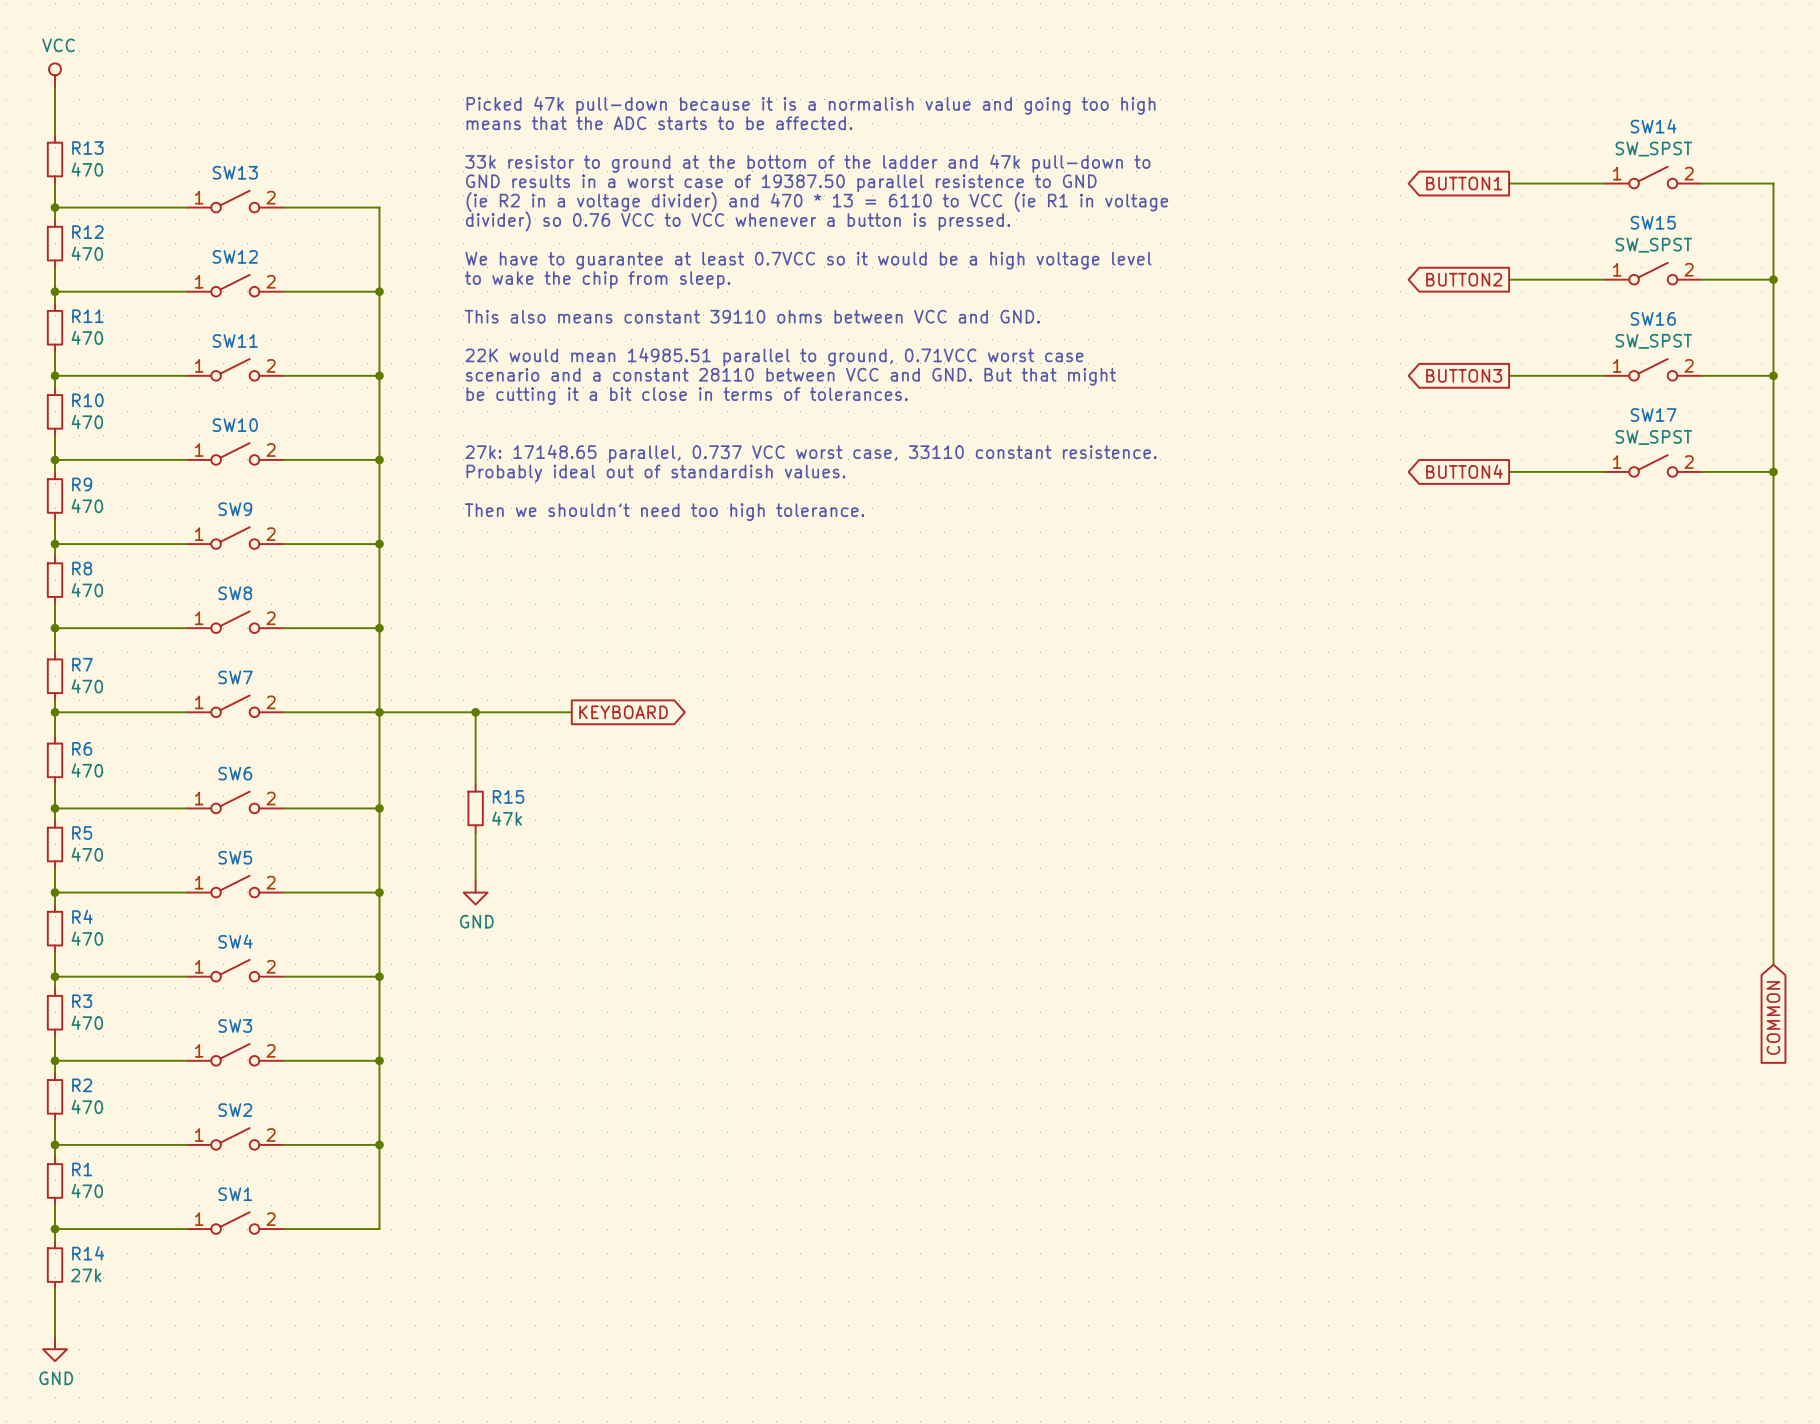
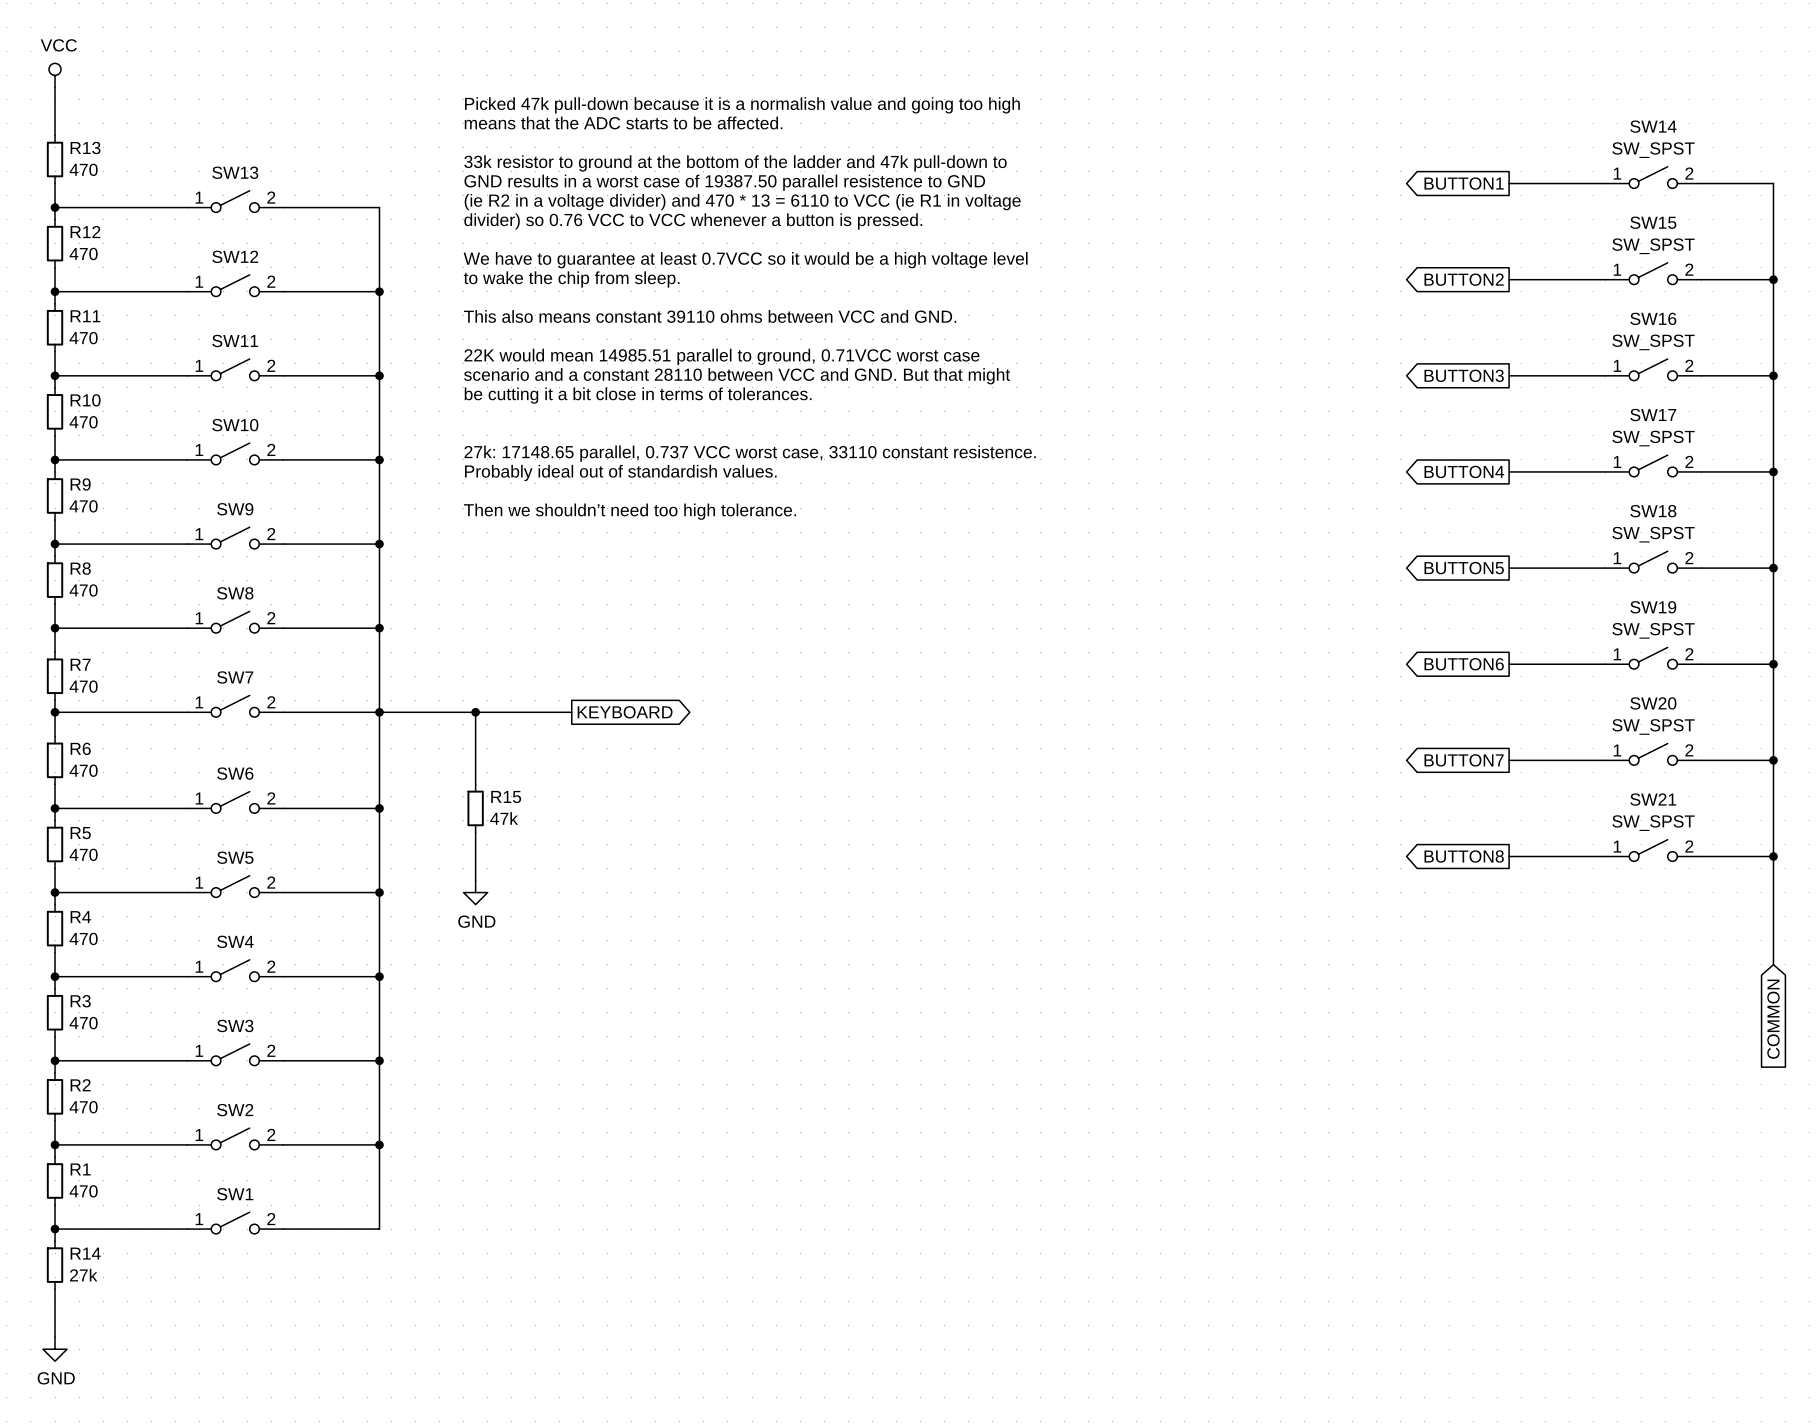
SW18: none -> SW_SPST (1653, 562)
global label: none -> BUTTON5 (1464, 568)
wire: none -> (1509, 568) (1605, 568)
wire: none -> (1701, 568) (1773, 568)
junction: none -> (1773, 568)
SW19: none -> SW_SPST (1653, 658)
global label: none -> BUTTON6 (1464, 664)
wire: none -> (1509, 664) (1605, 664)
wire: none -> (1701, 664) (1773, 664)
junction: none -> (1773, 664)
SW20: none -> SW_SPST (1653, 754)
global label: none -> BUTTON7 (1464, 760)
wire: none -> (1509, 760) (1605, 760)
wire: none -> (1701, 760) (1773, 760)
junction: none -> (1773, 760)
SW21: none -> SW_SPST (1653, 850)
global label: none -> BUTTON8 (1464, 856)
wire: none -> (1509, 856) (1605, 856)
wire: none -> (1701, 856) (1773, 856)
junction: none -> (1773, 856)

